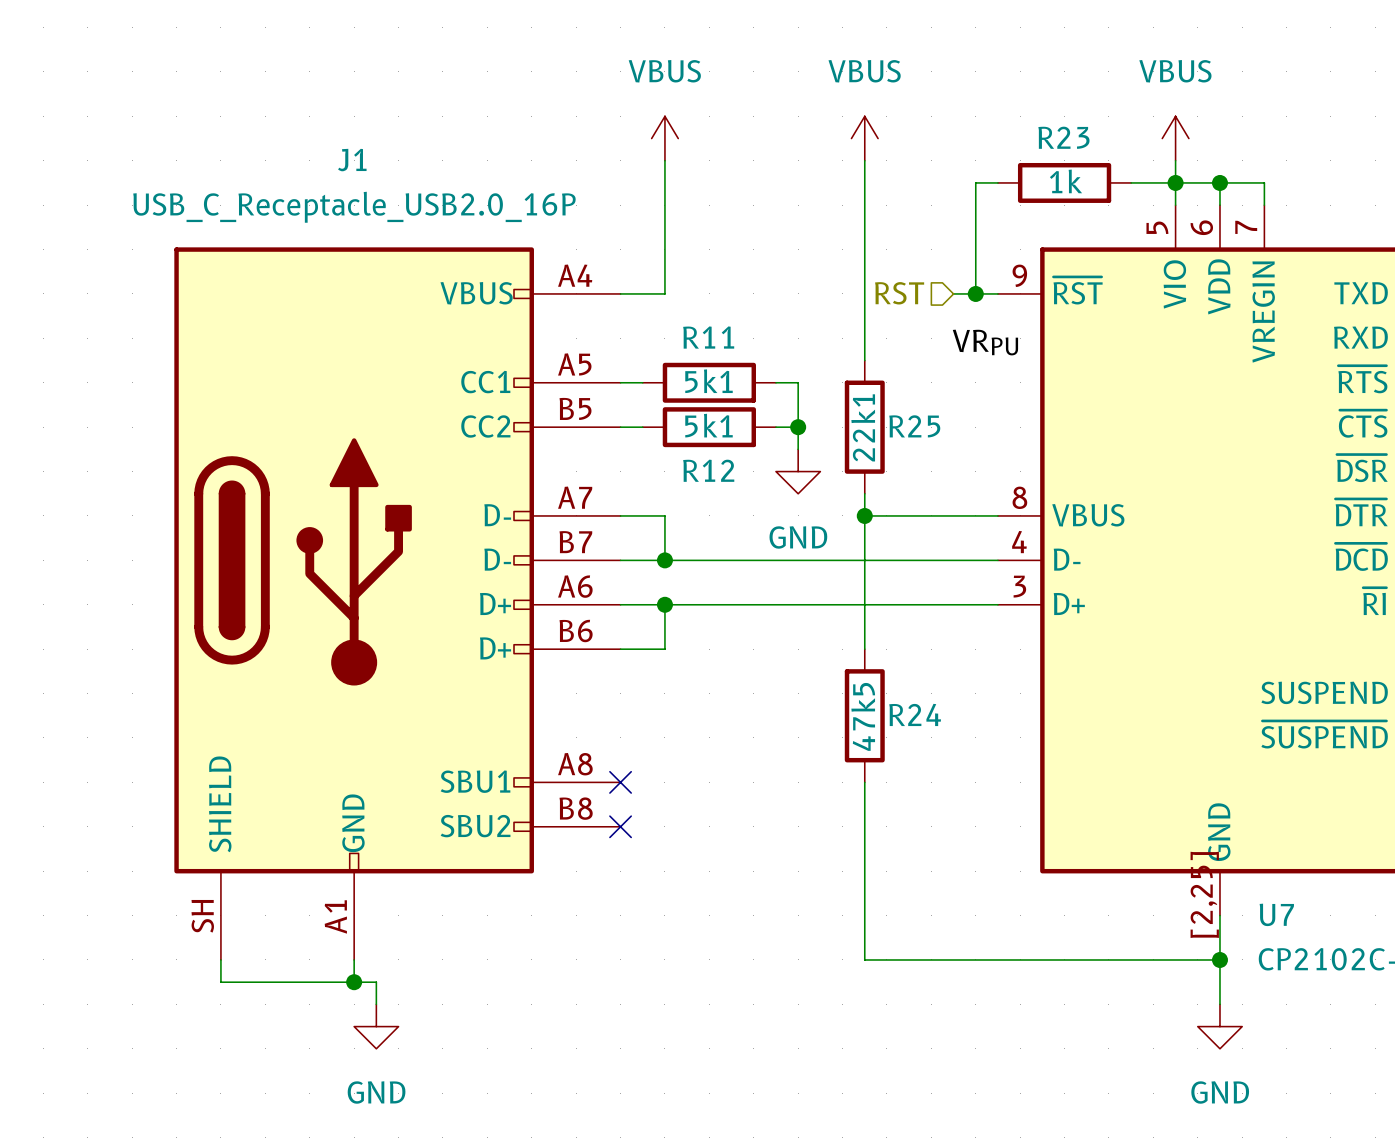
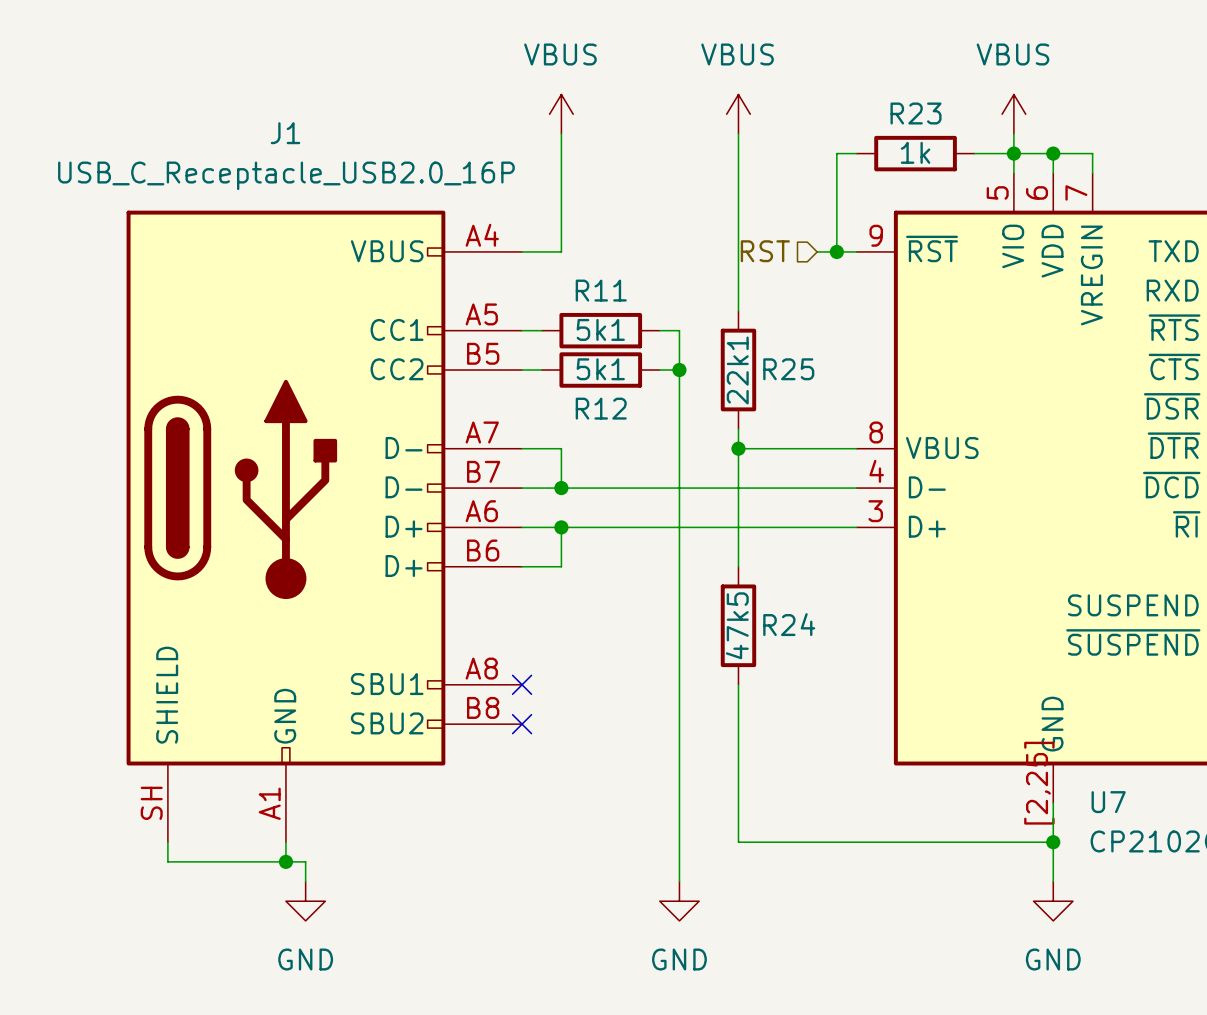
label: VRPU (985, 342) -> none
wire: none -> (679, 389) (679, 881)
power symbol: GND (798, 471) -> none
power symbol: none -> GND (679, 901)

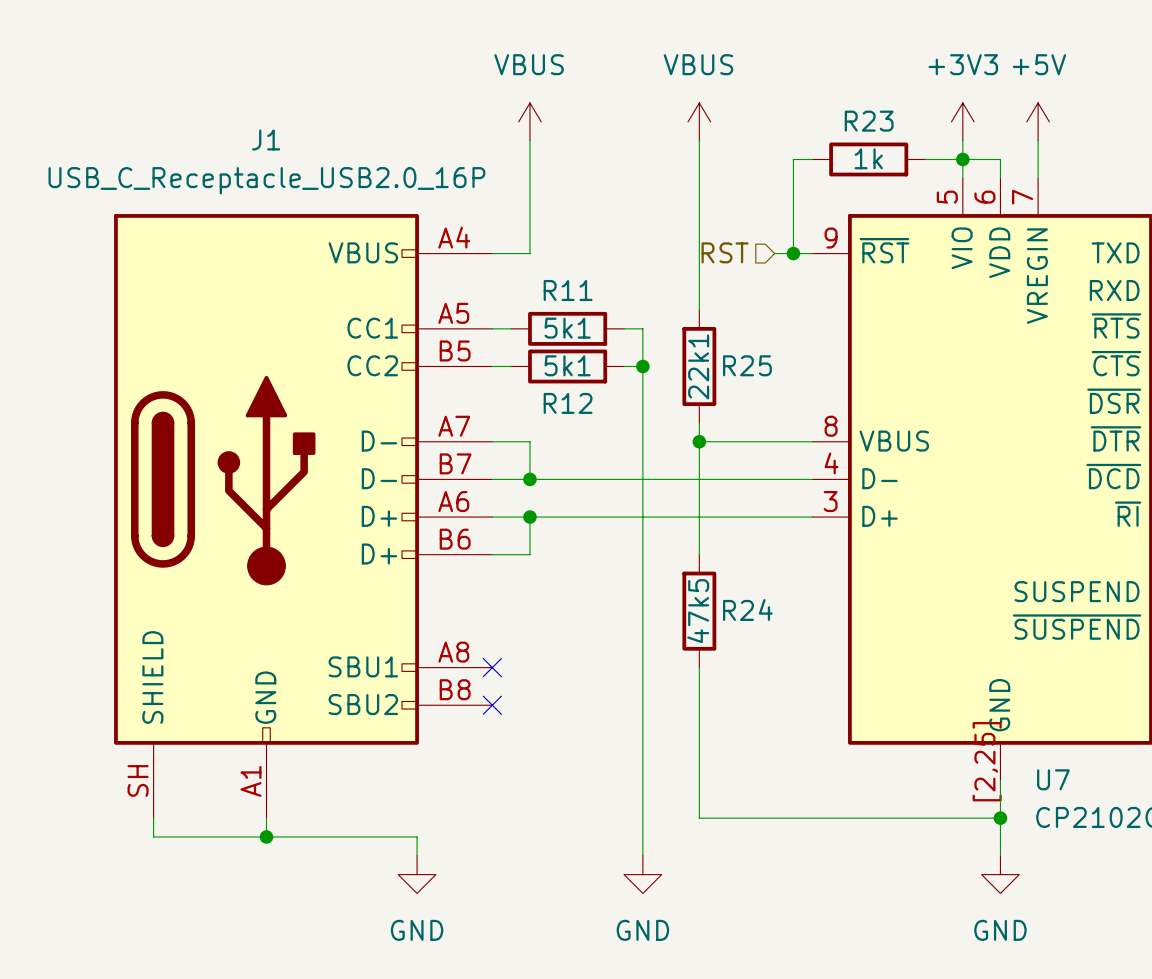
power symbol: VBUS (1013, 114) -> +3V3 (962, 121)
power symbol: none -> +5V (1038, 121)
wire: (1053, 153) (1092, 153) -> (1038, 140) (1038, 159)
junction: (1053, 153) -> none
wire: (305, 861) (305, 881) -> (285, 836) (417, 836) (417, 855)
power symbol position: GND (305, 901) -> GND (417, 874)

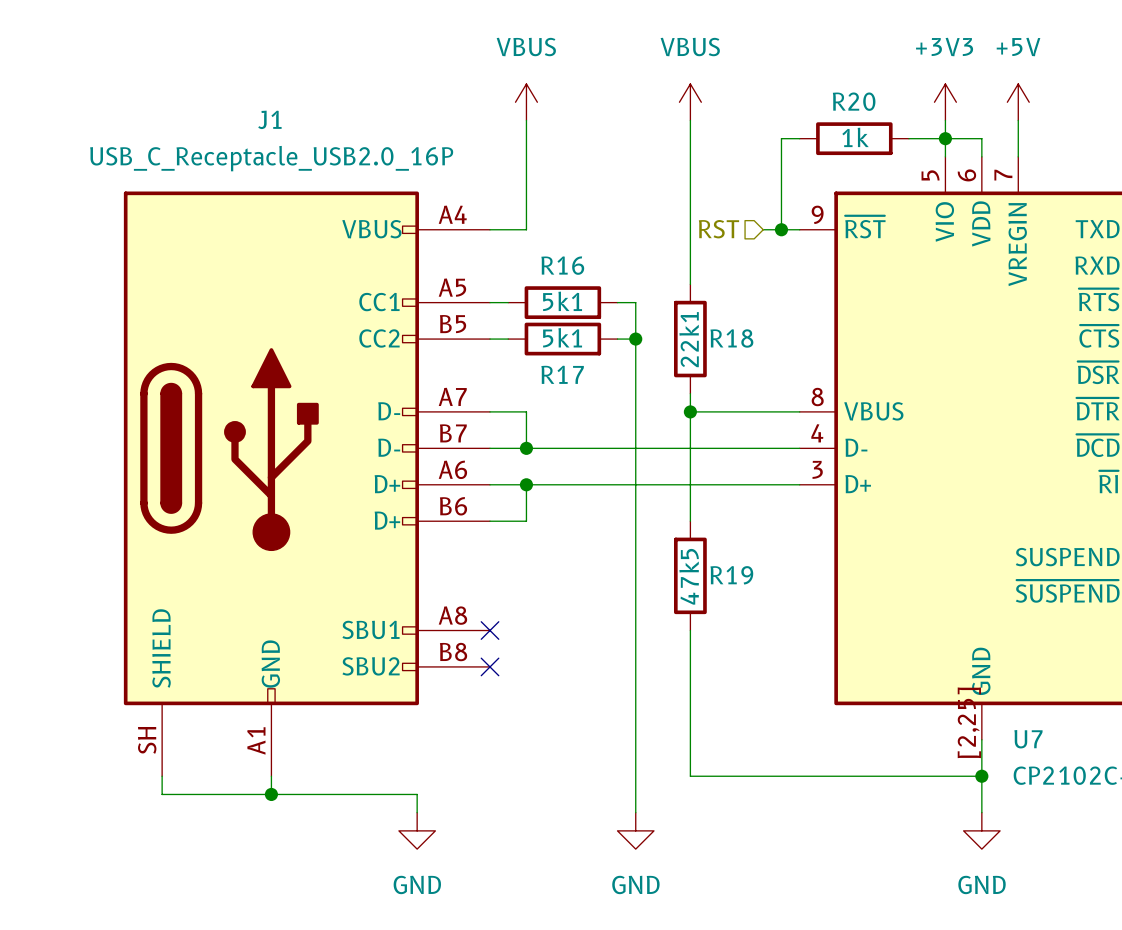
R23 name: R23 (869, 121) -> R20 (854, 101)
R11 name: R11 (568, 290) -> R16 (562, 265)
R25 name: R25 (747, 365) -> R18 (731, 338)
R12 name: R12 (568, 403) -> R17 (562, 374)
R24 name: R24 (747, 609) -> R19 (731, 575)

